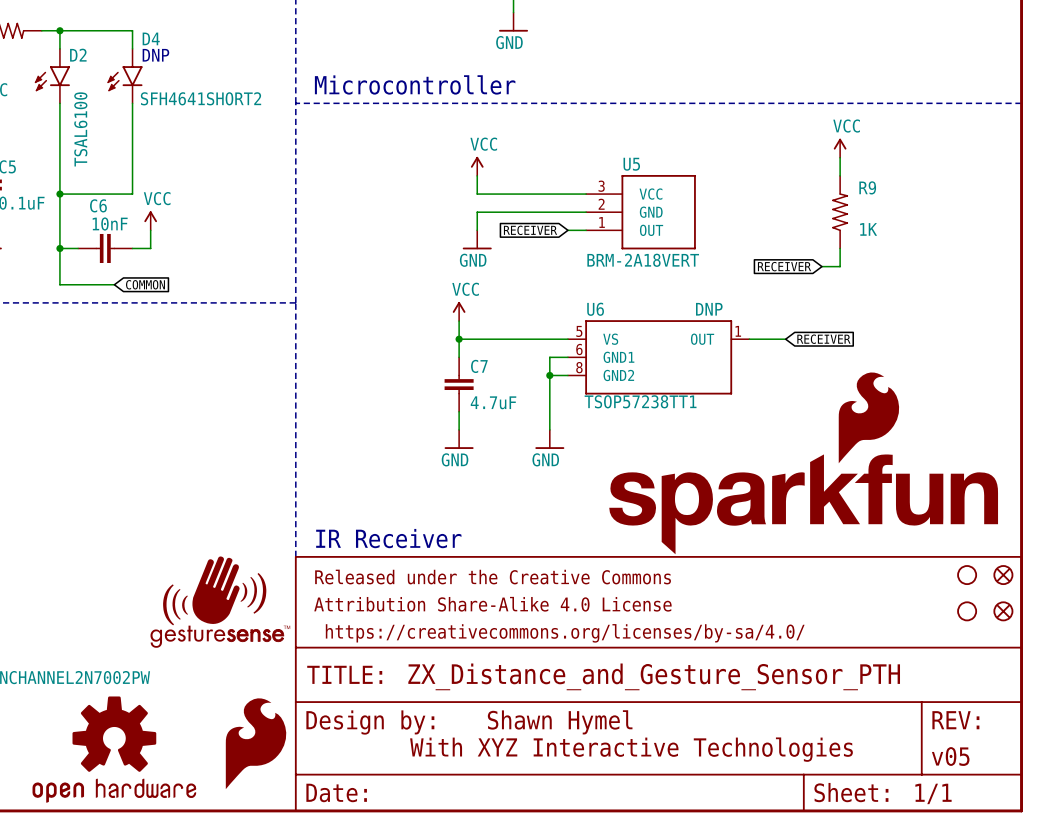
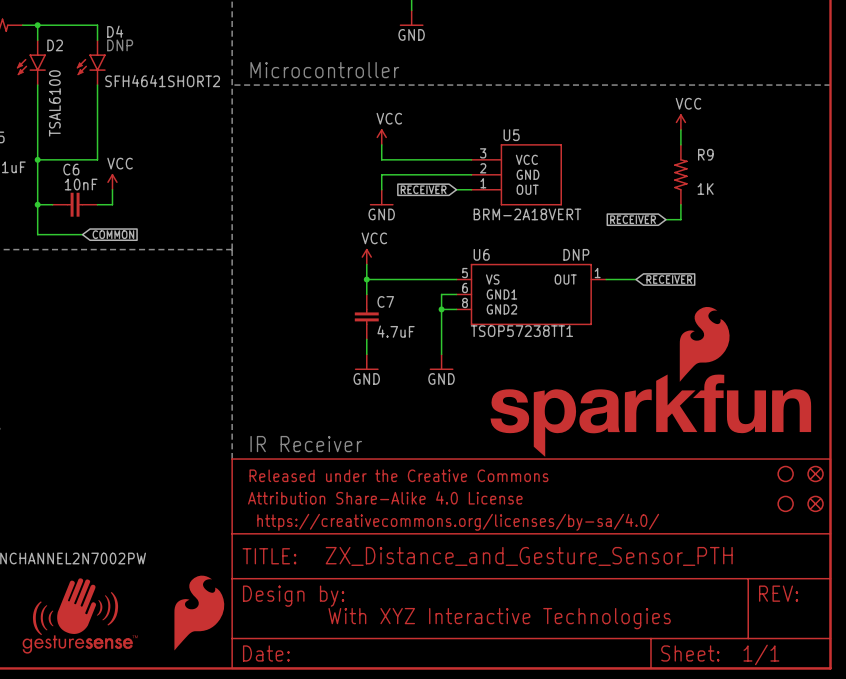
part: (220, 602) -> none
part symbol: [32, 696, 197, 803] -> [22, 578, 138, 654]
part text: Shawn Hymel (560, 722) -> none
part text: v05 (950, 756) -> none

